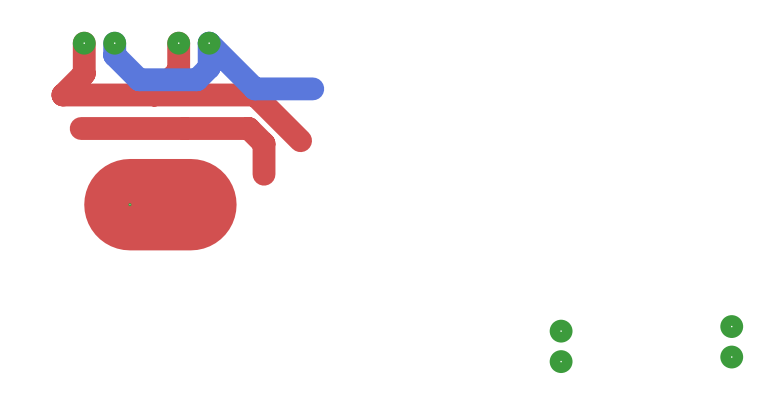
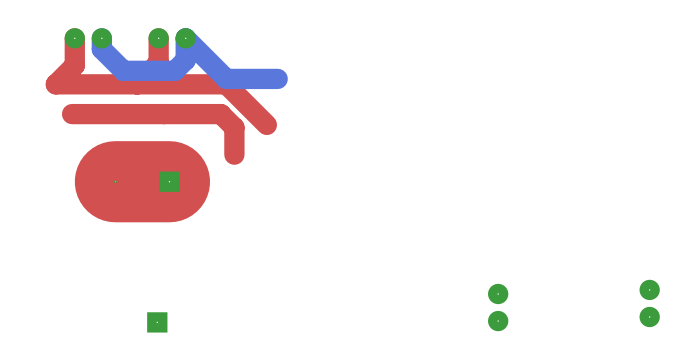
part: none -> (169, 181)
part: none -> (157, 322)

